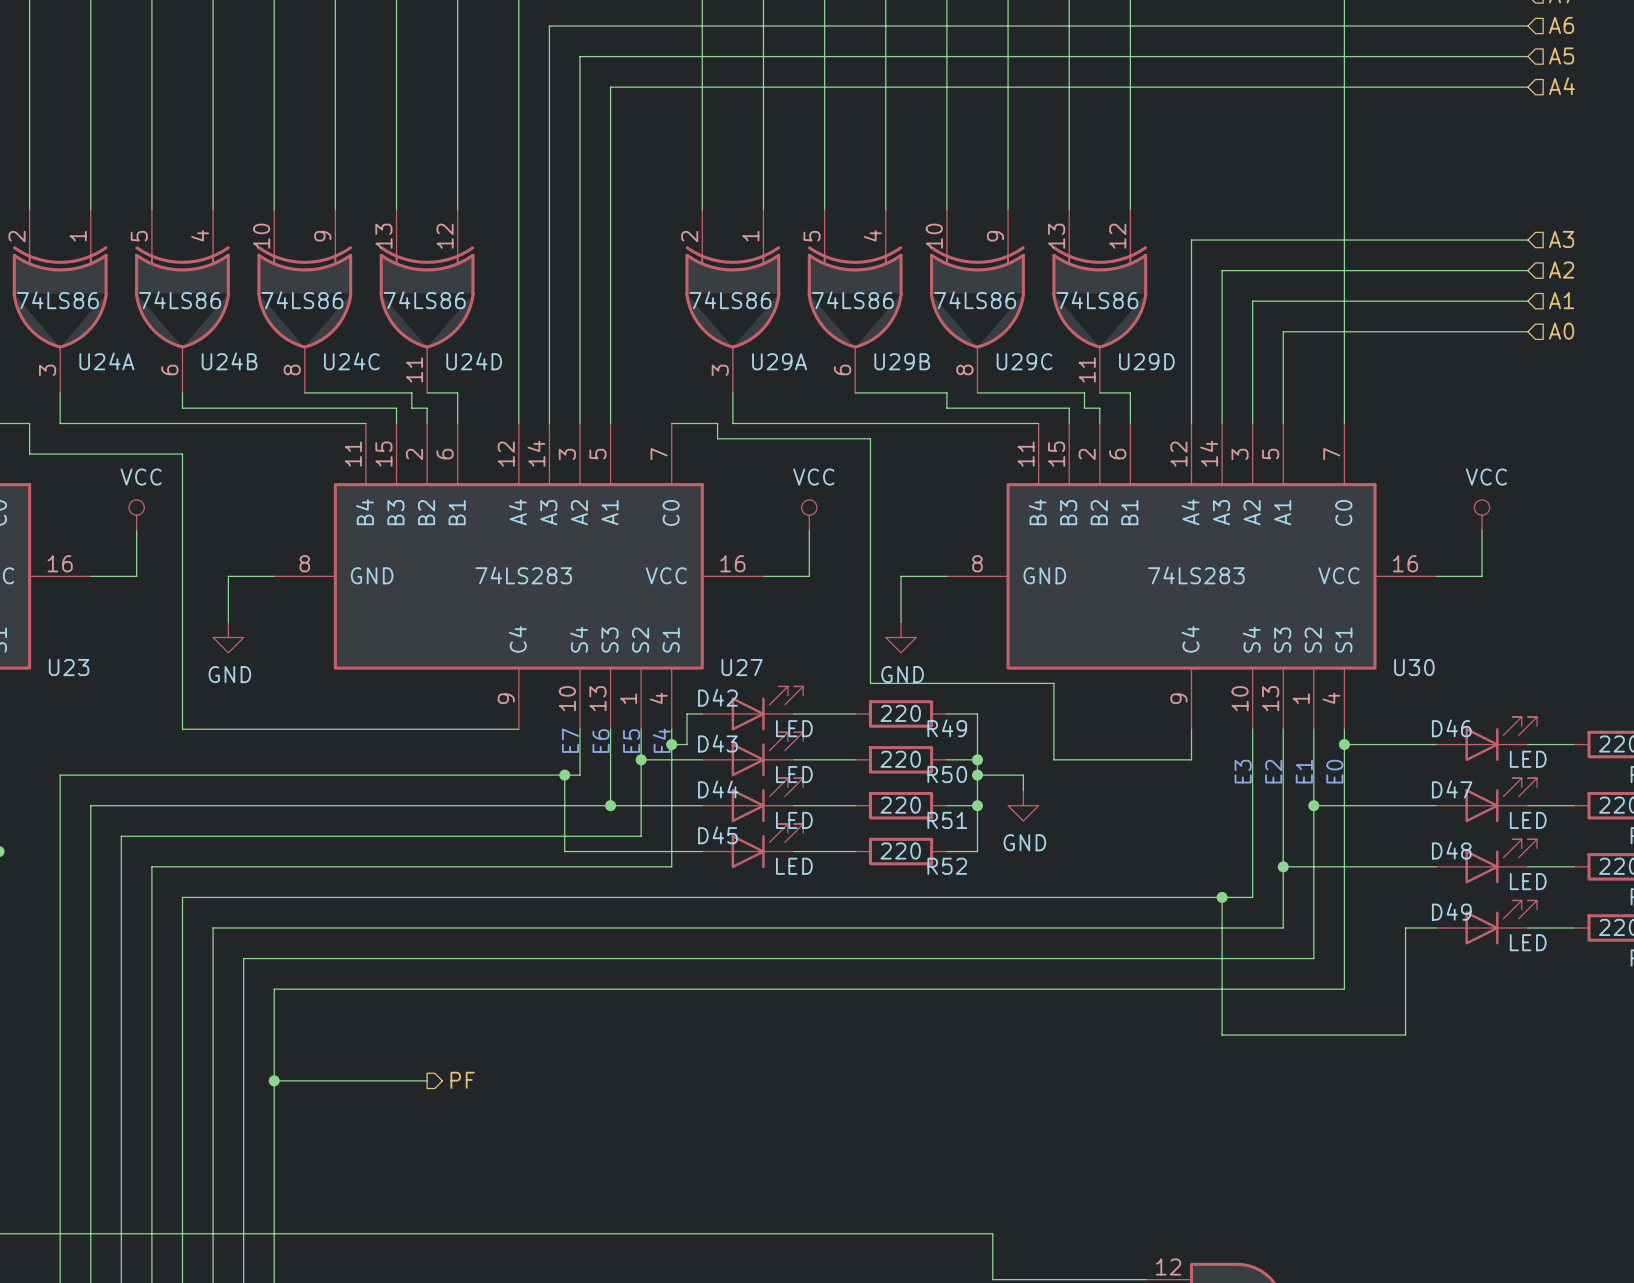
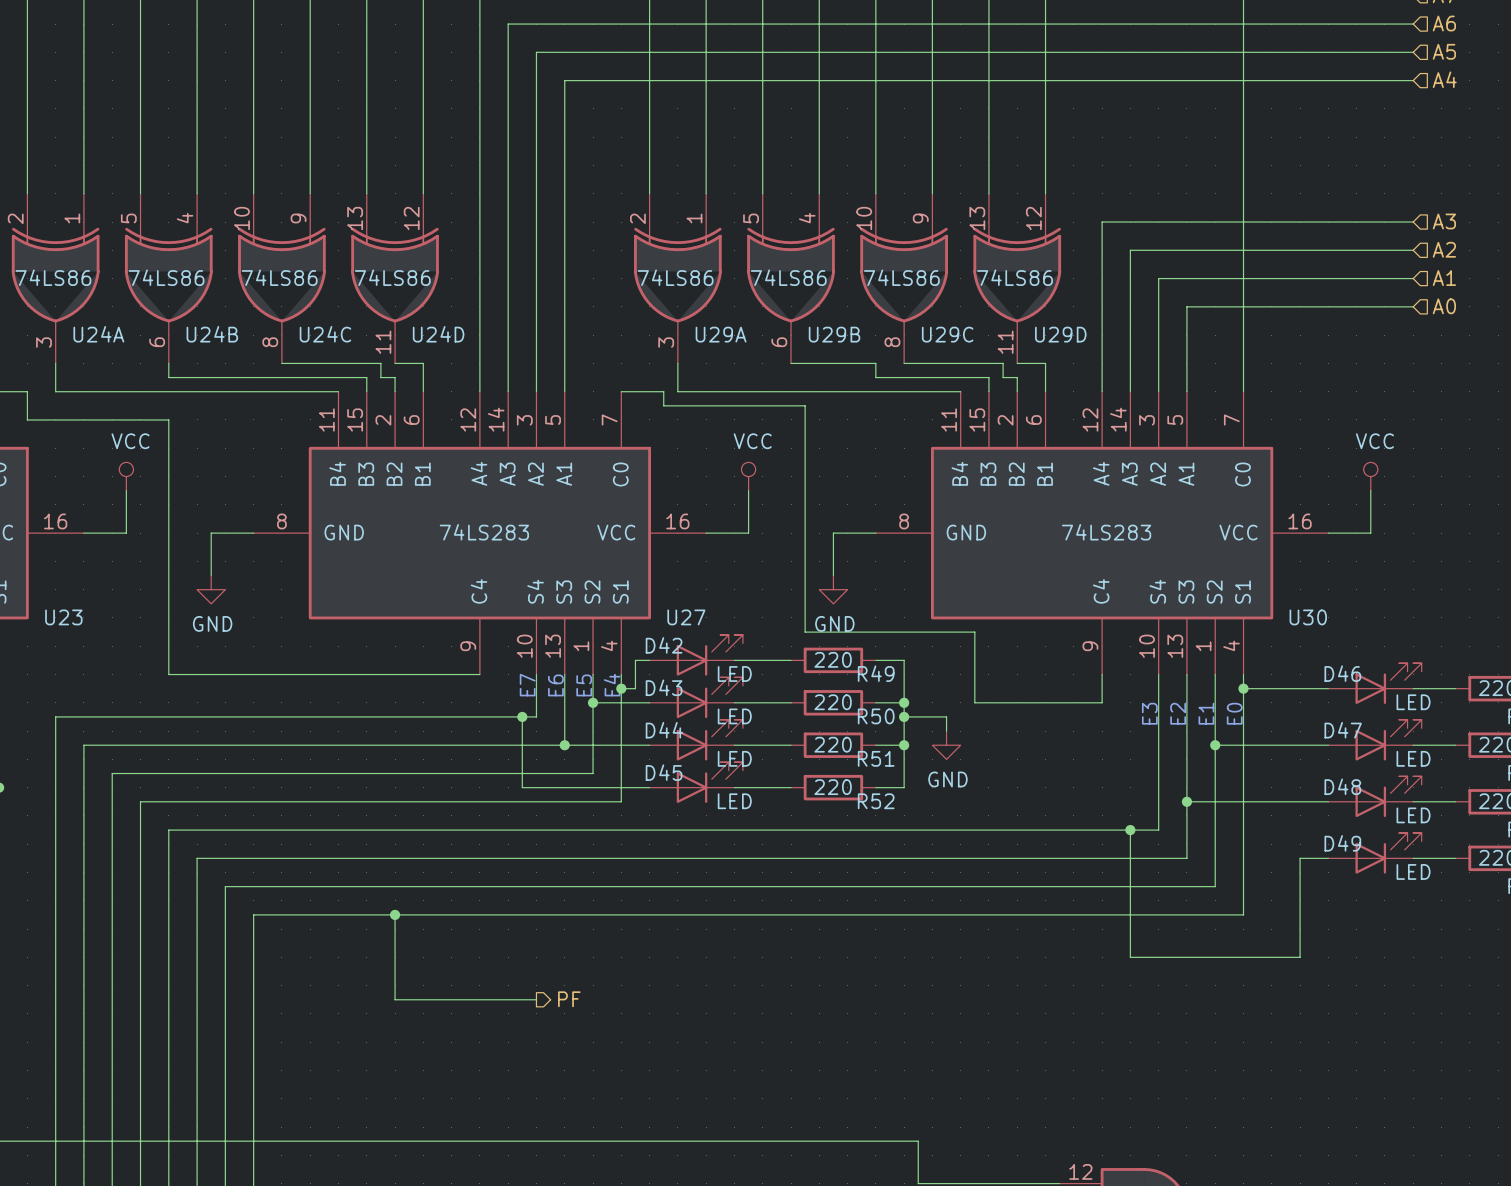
wire: none -> (395, 914) (395, 999) (536, 999)
junction: none -> (395, 914)
wire: (274, 1080) (427, 1080) -> none
junction: (274, 1080) -> none
hierarchical label position: PF (462, 1080) -> PF (569, 999)

